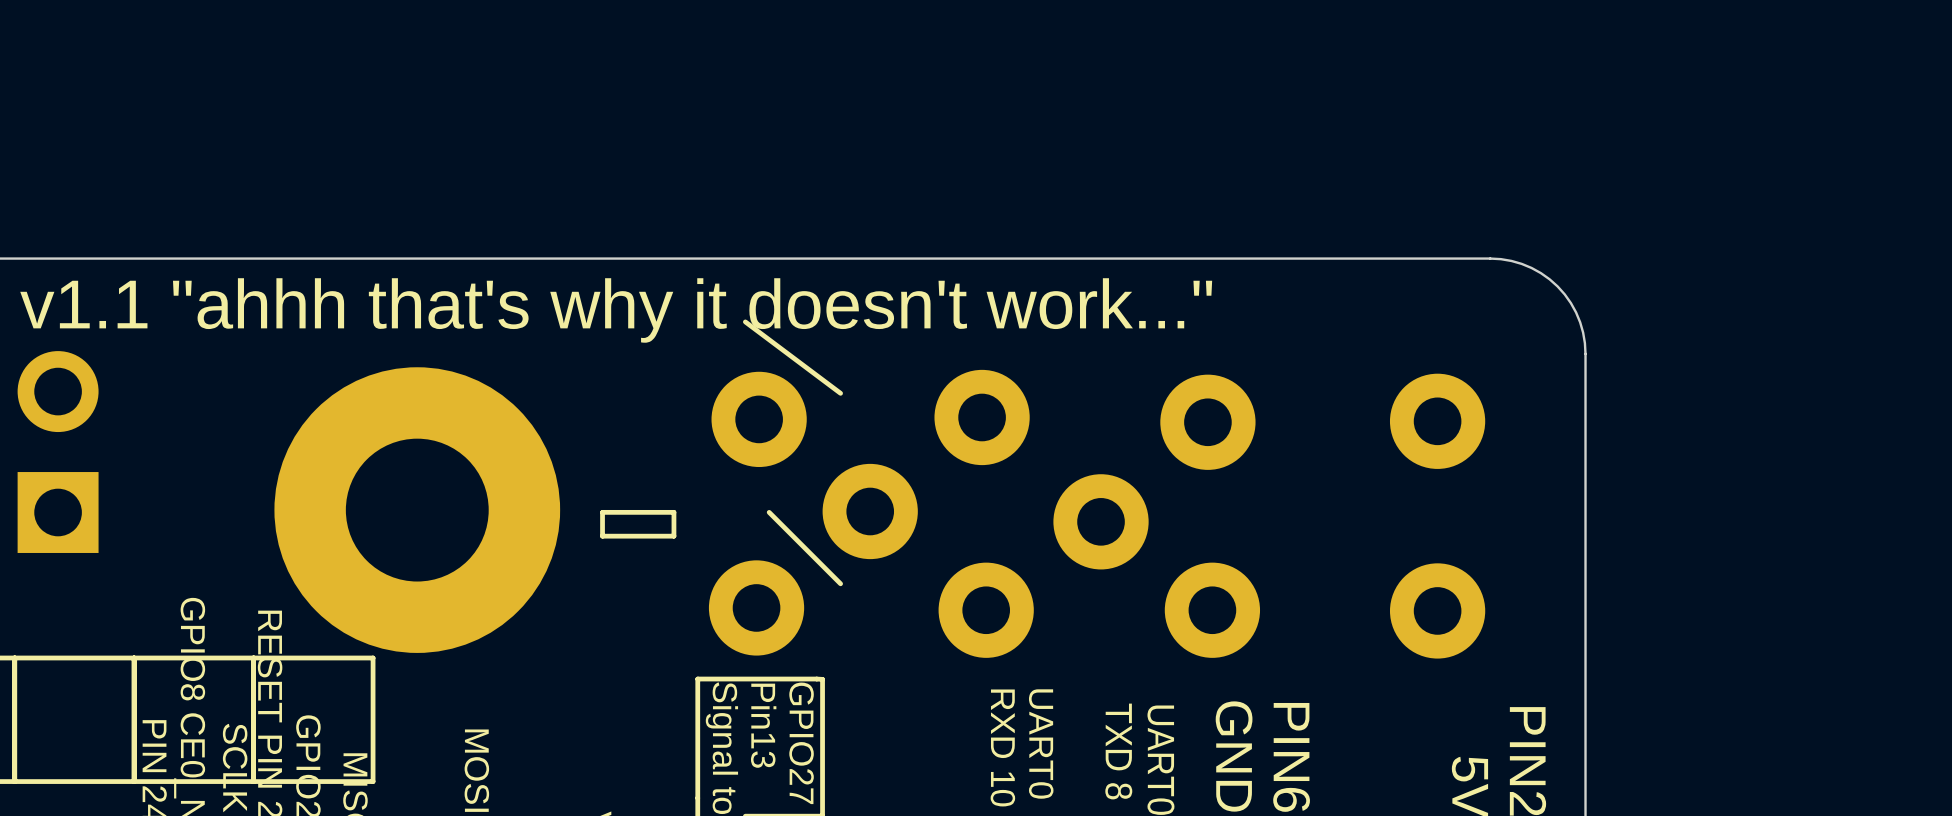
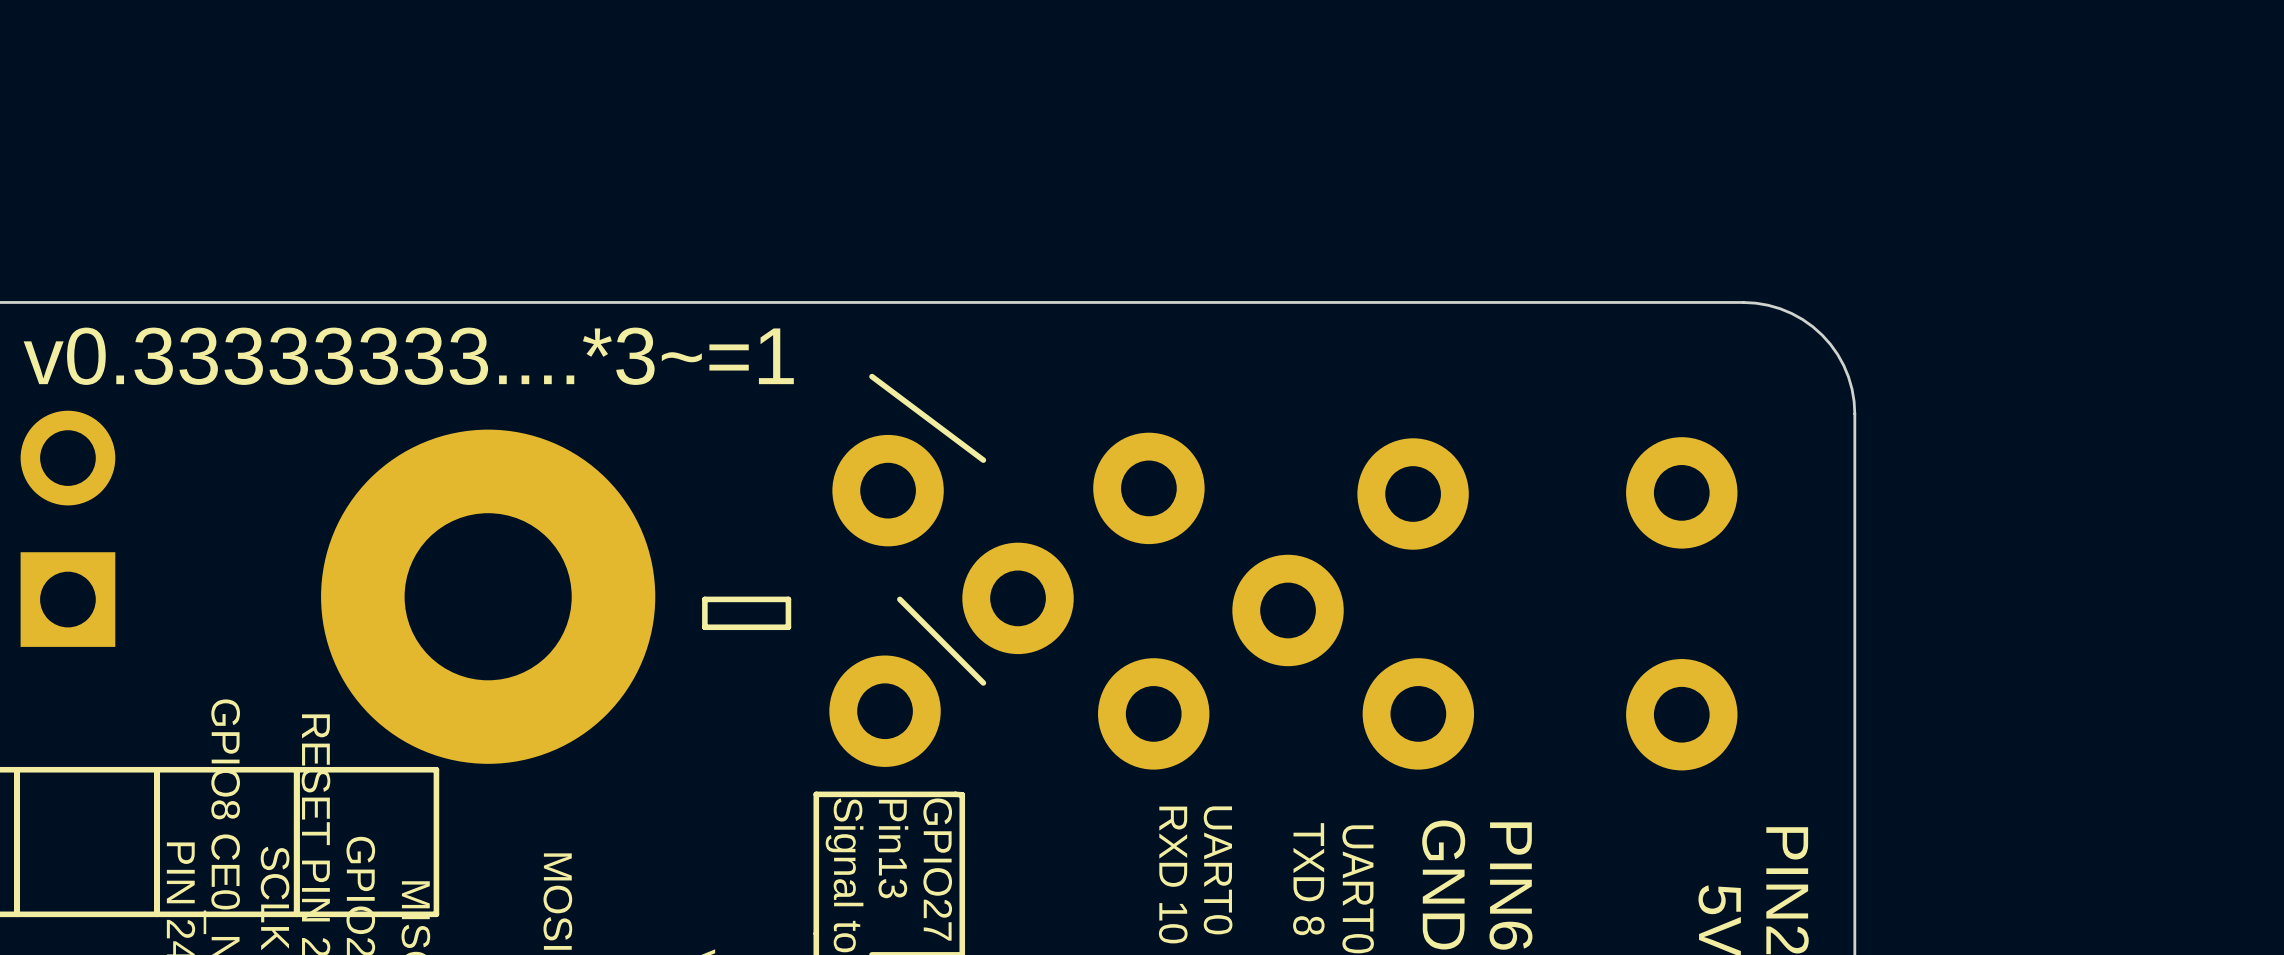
text: v1.1 "ahhh that's why it doesn't work..." (616, 310) -> v0.33333333....*3~=1 (408, 356)

